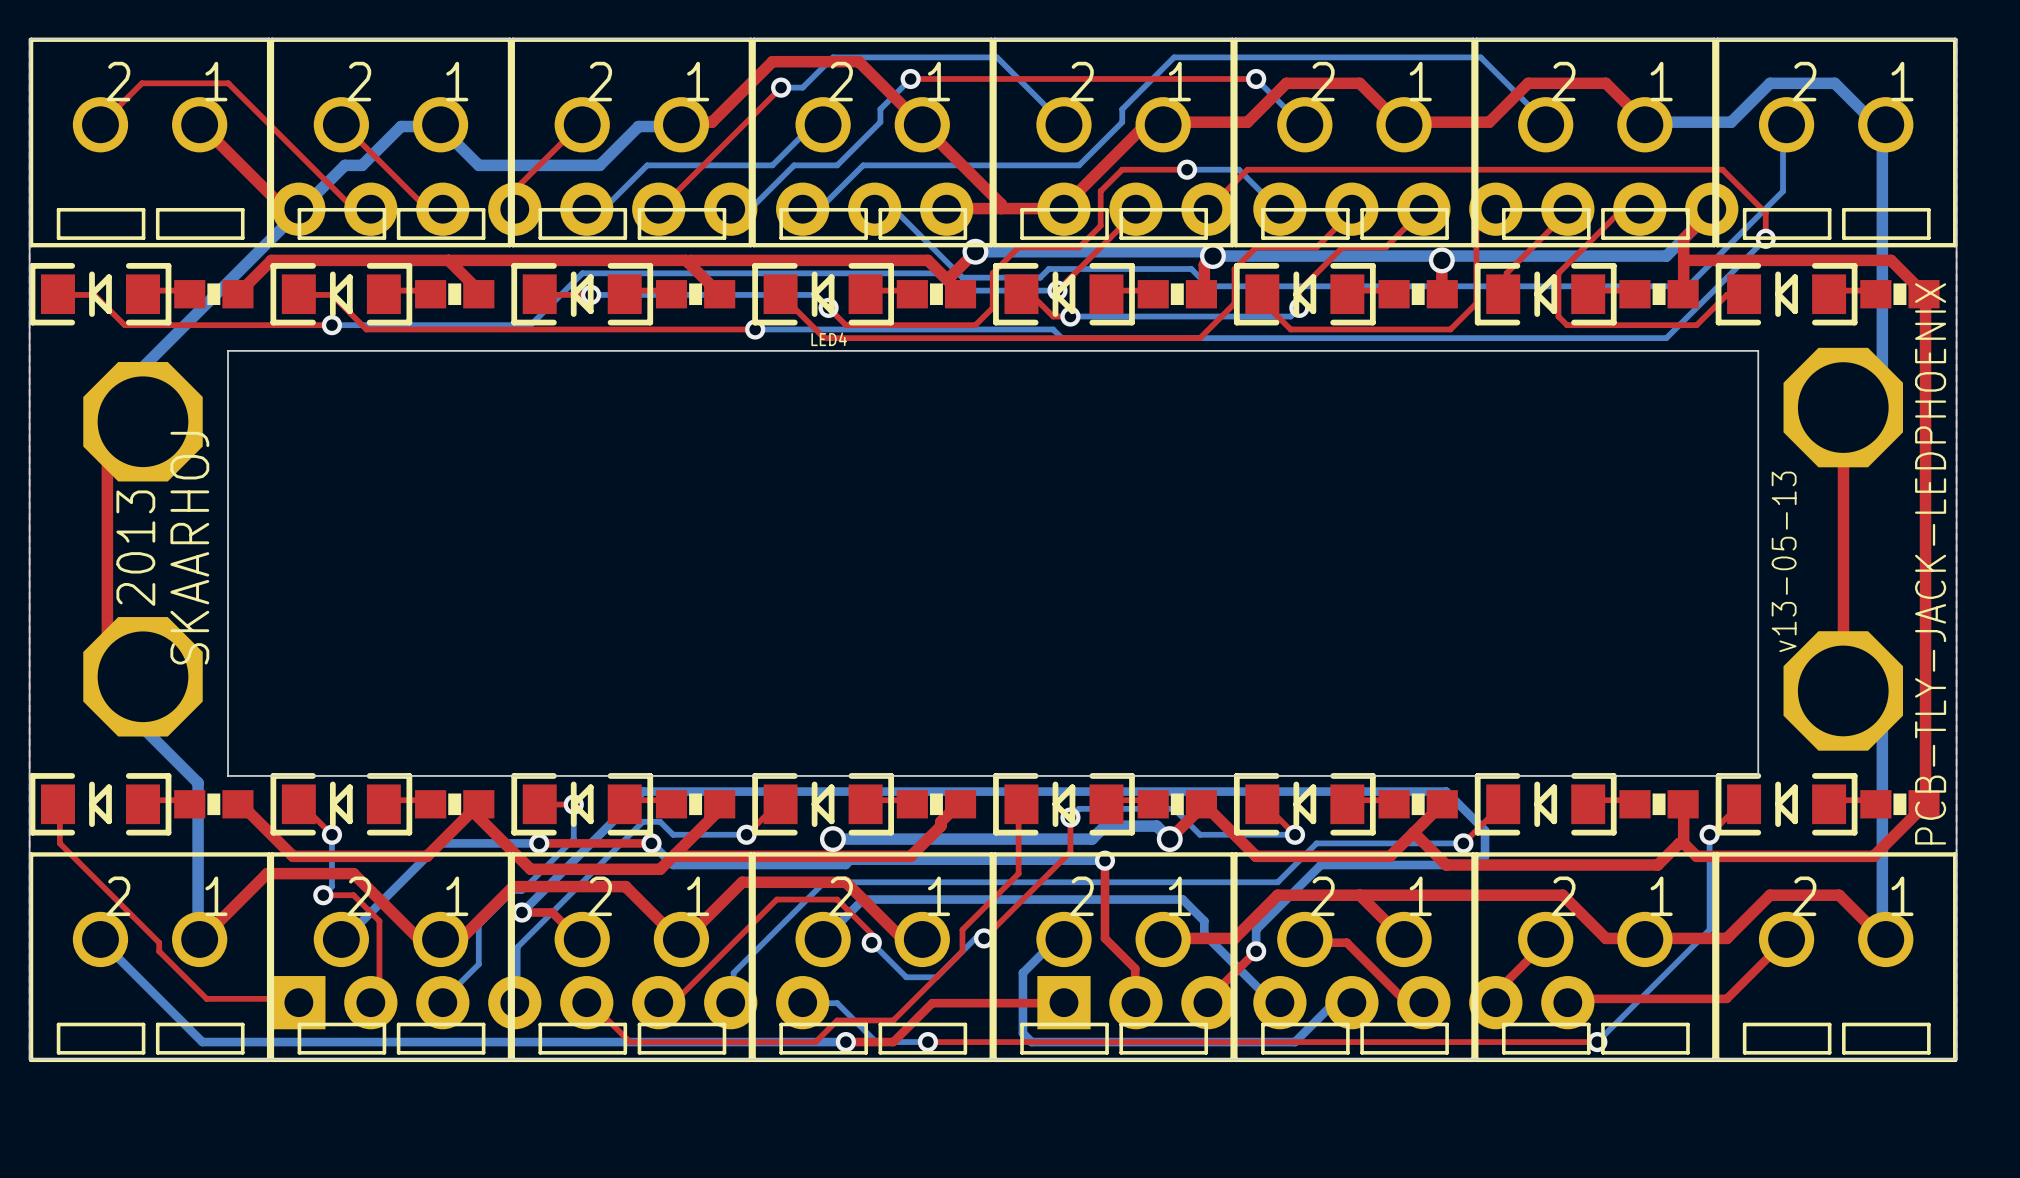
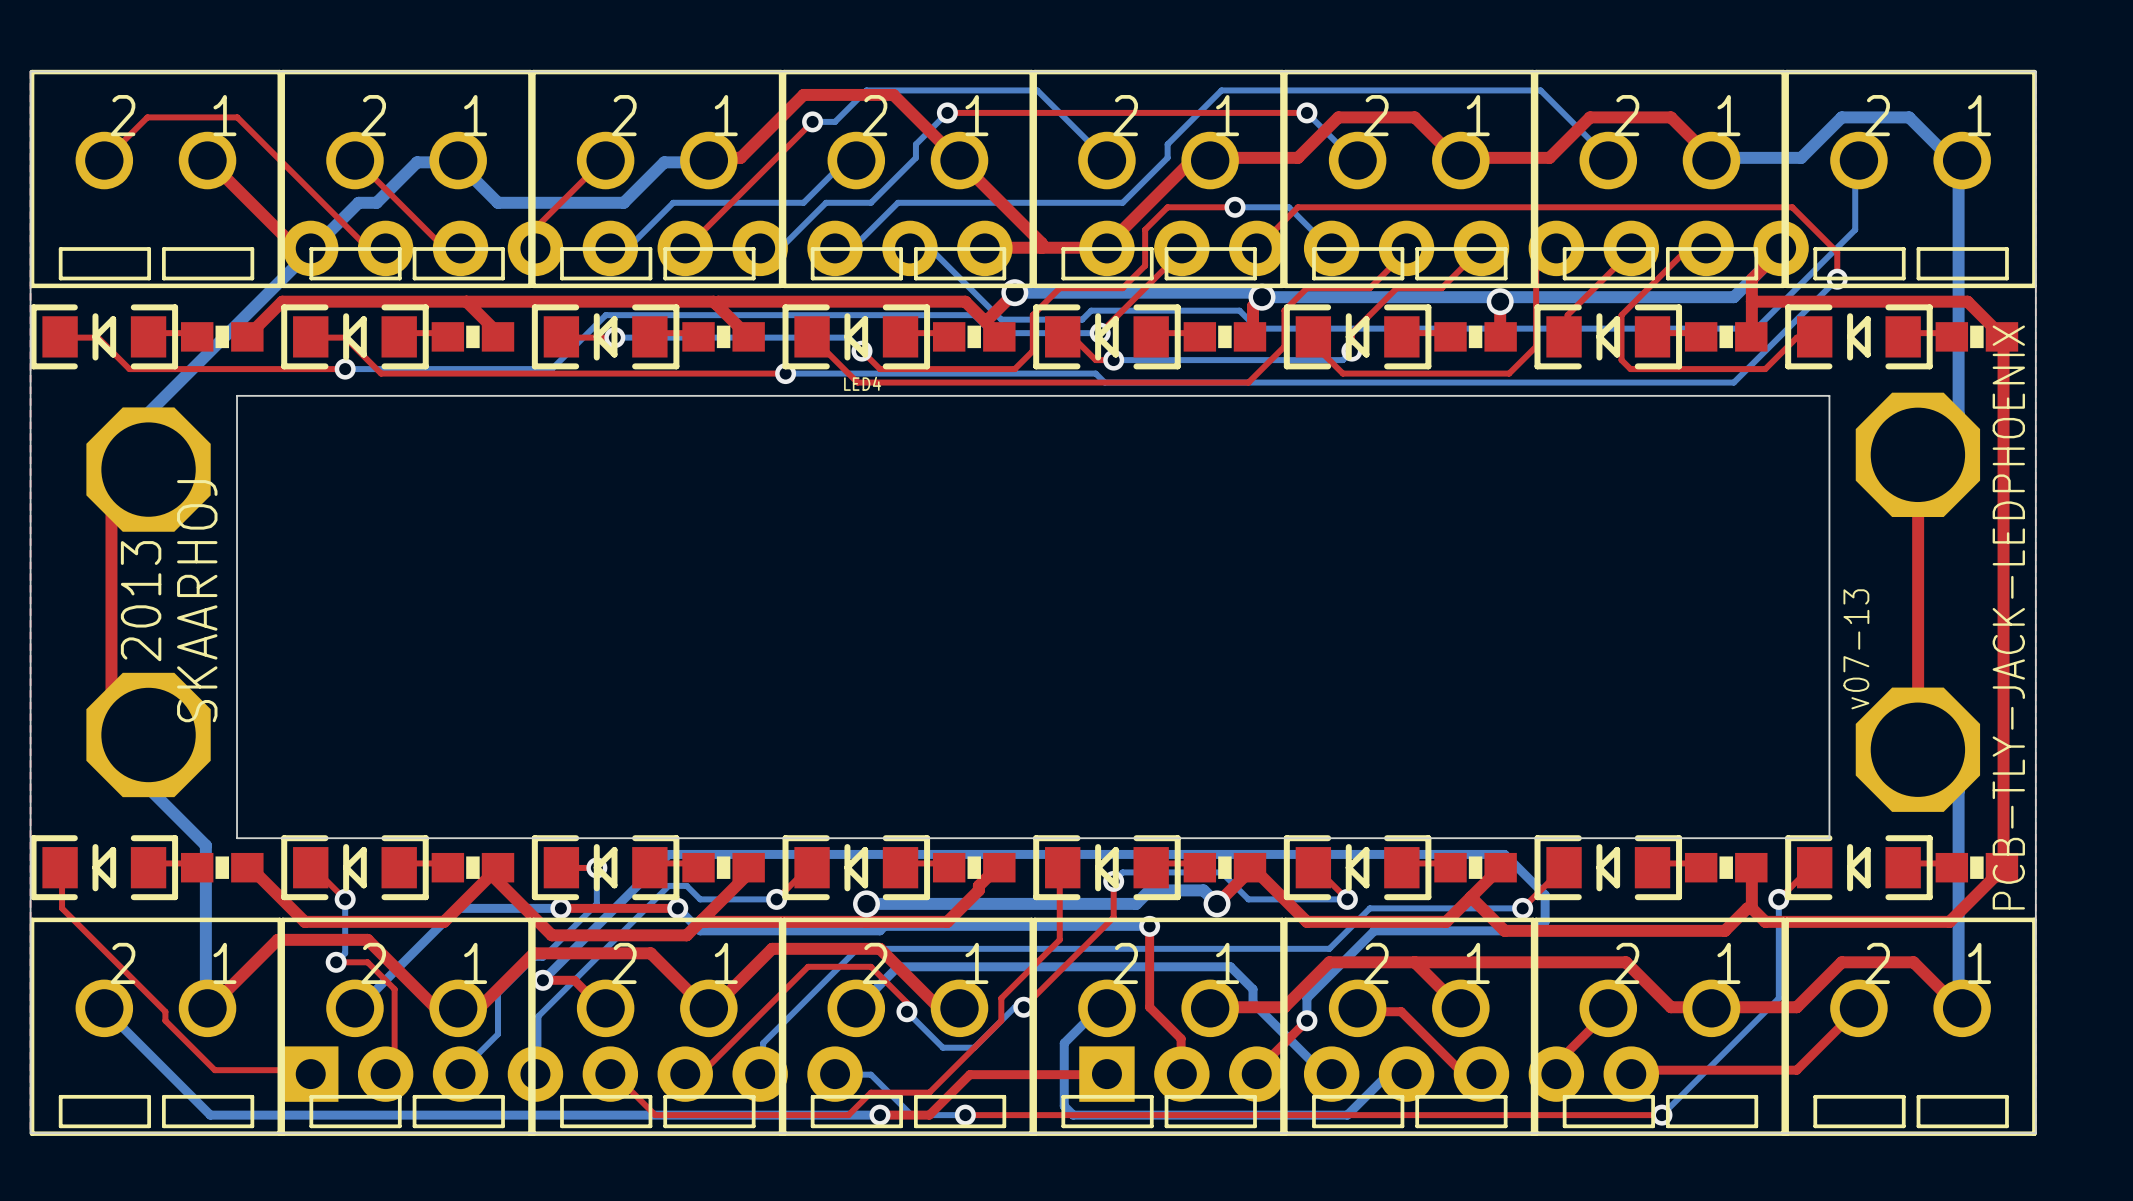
text: v13-05-13 (1784, 561) -> v07-13 (1856, 649)

